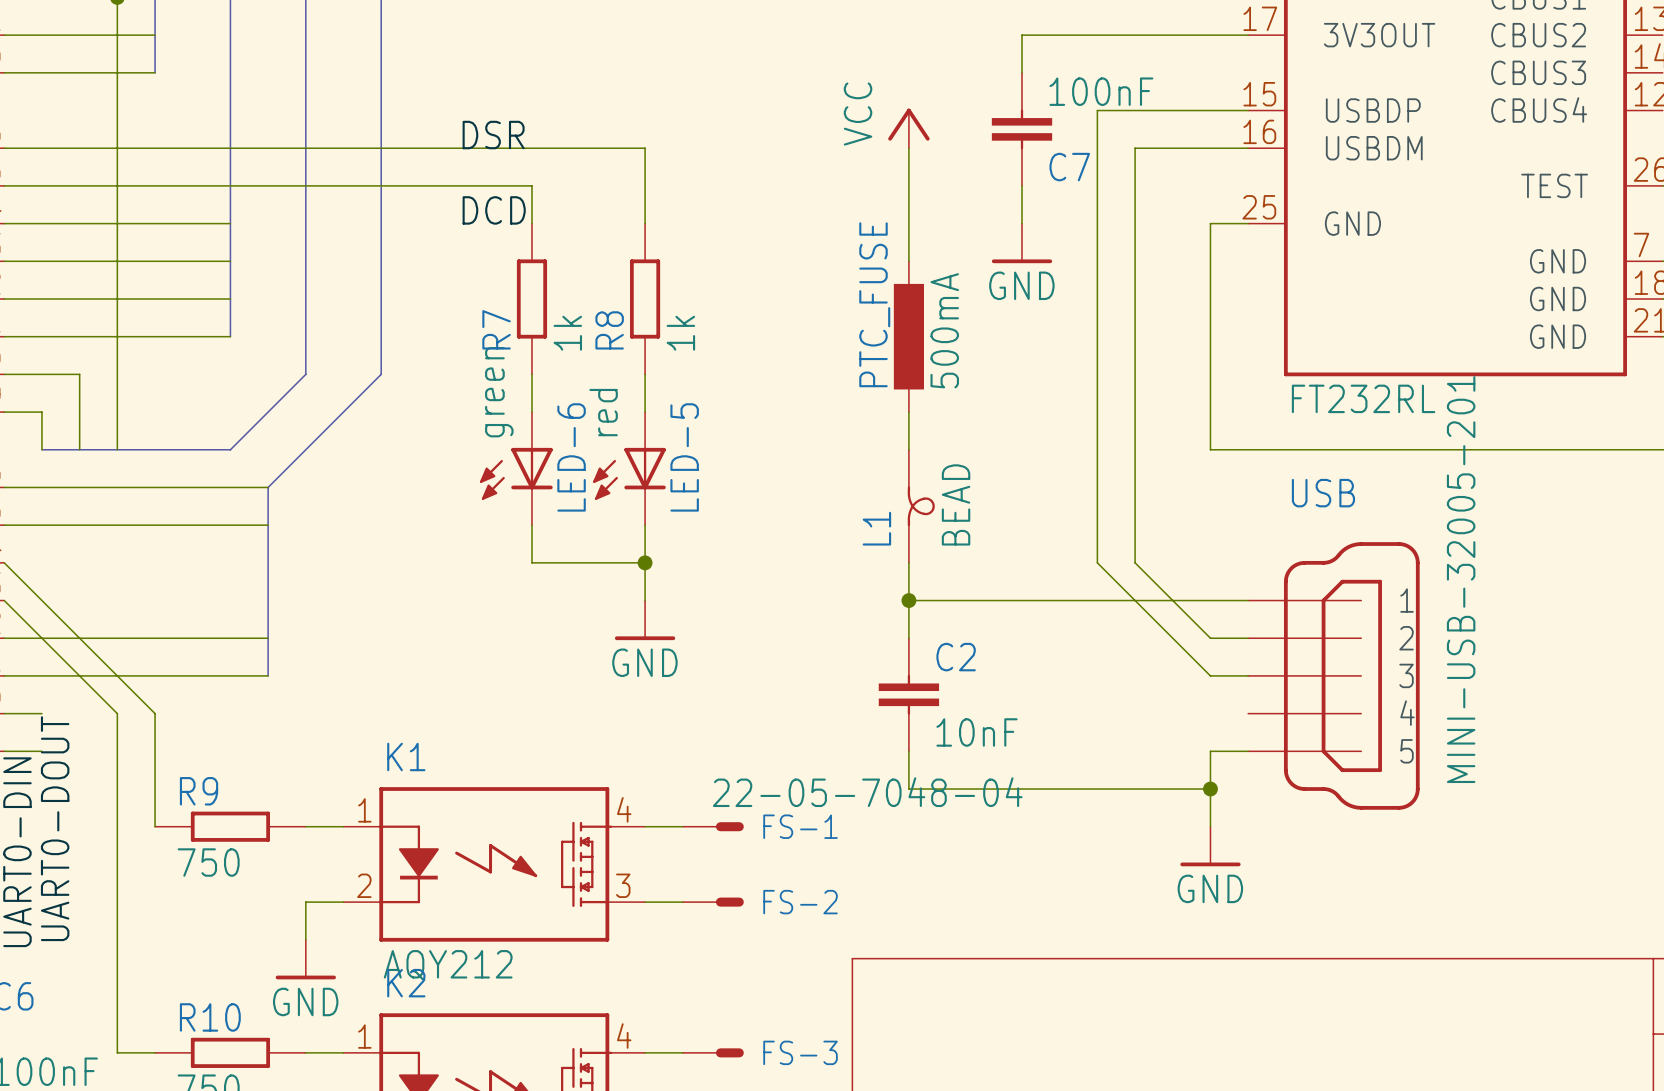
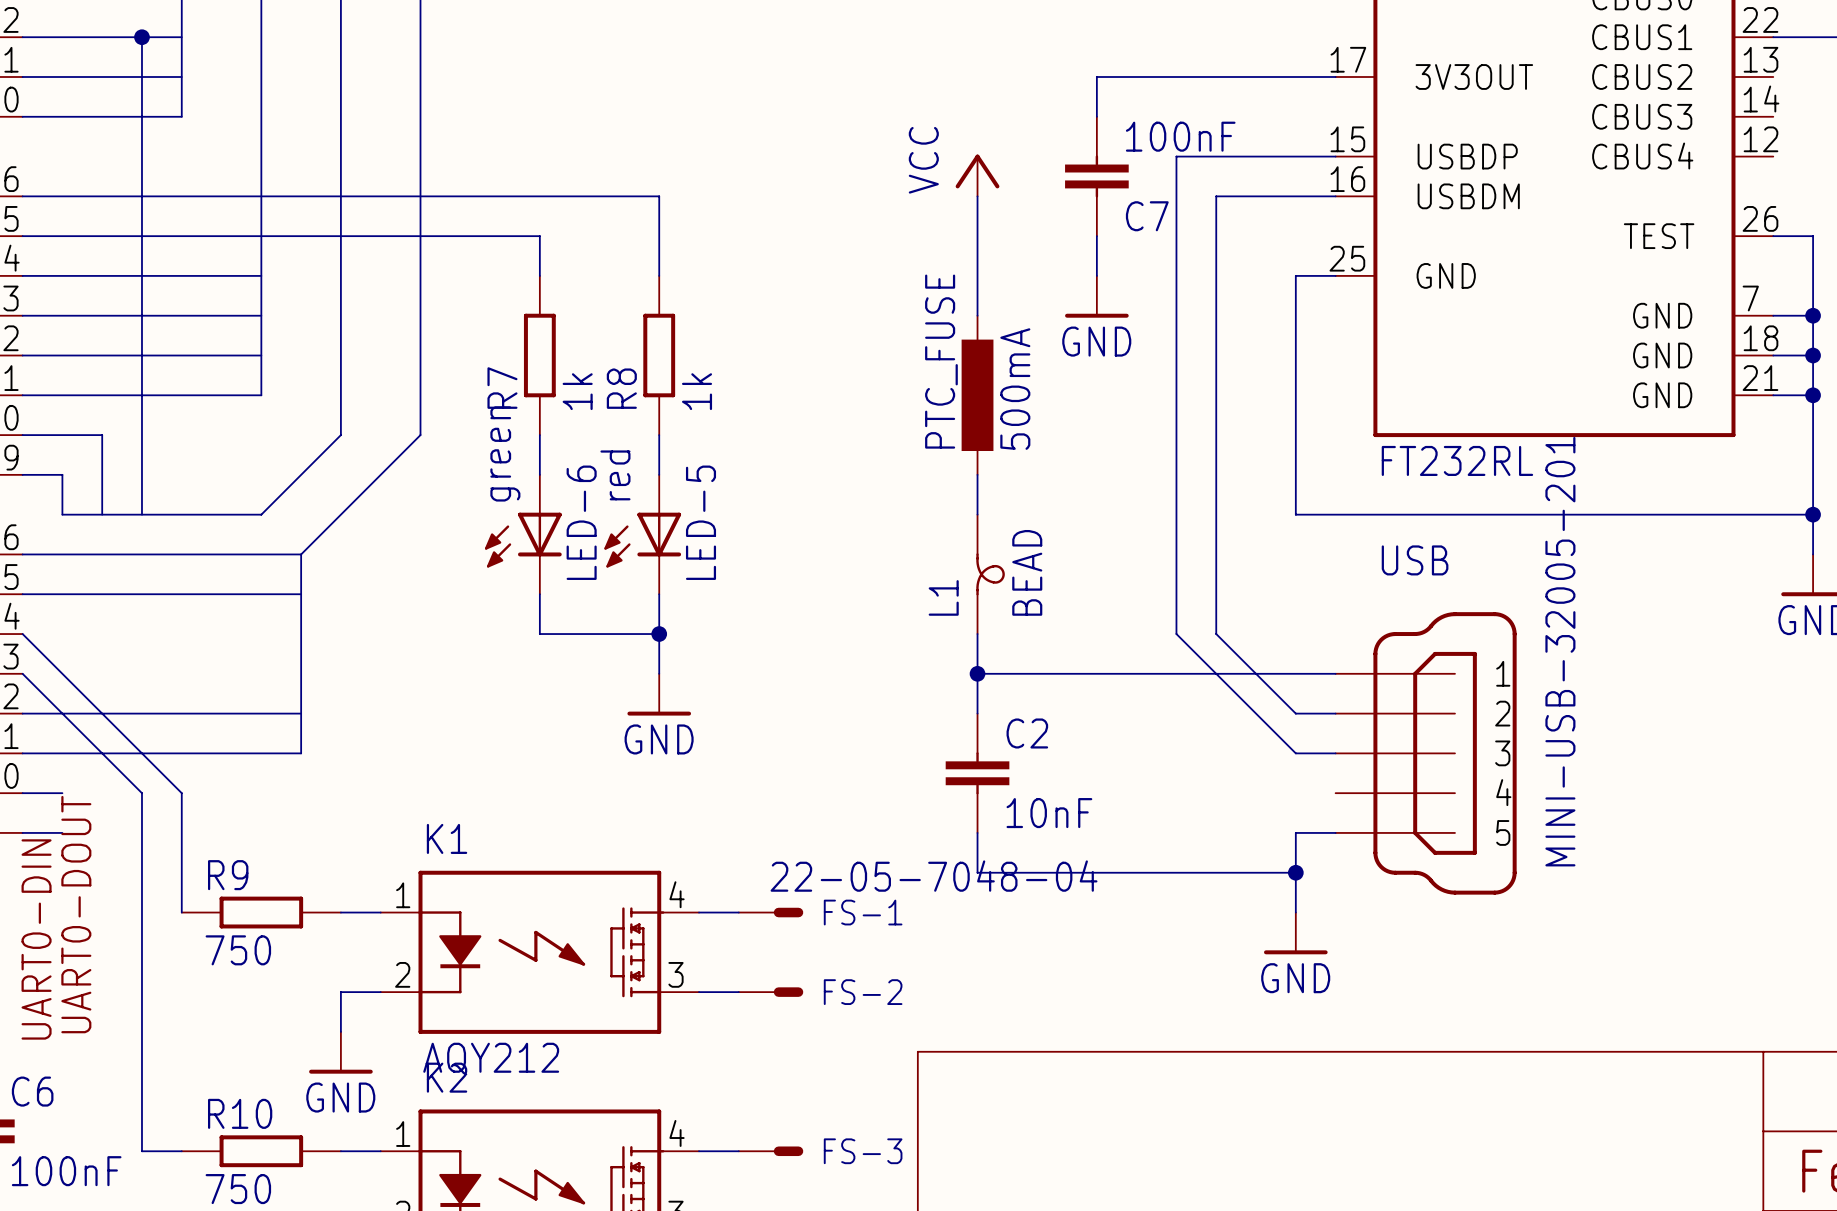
label: DSR (493, 135) -> none
wire: (607, 148) (645, 148) (645, 223) -> (659, 196) (659, 275)
wire: (494, 185) (531, 185) (531, 223) -> (539, 236) (539, 275)
label: DCD (494, 210) -> none
R7 position: (531, 298) -> (539, 355)
R8 position: (645, 298) -> (659, 355)
wire: (531, 374) (531, 412) -> (539, 435) (539, 474)
wire: (645, 374) (645, 412) -> (659, 435) (659, 474)
LED-6 position: (516, 468) -> (523, 534)
LED-5 position: (629, 468) -> (642, 534)
wire: (531, 525) (531, 562) -> (539, 594) (539, 634) (579, 634)
wire: (645, 525) (645, 600) -> (659, 594) (659, 673)
wire: (607, 562) (645, 562) -> none
junction position: (645, 562) -> (659, 634)
power symbol position: GND (645, 620) -> GND (659, 694)

